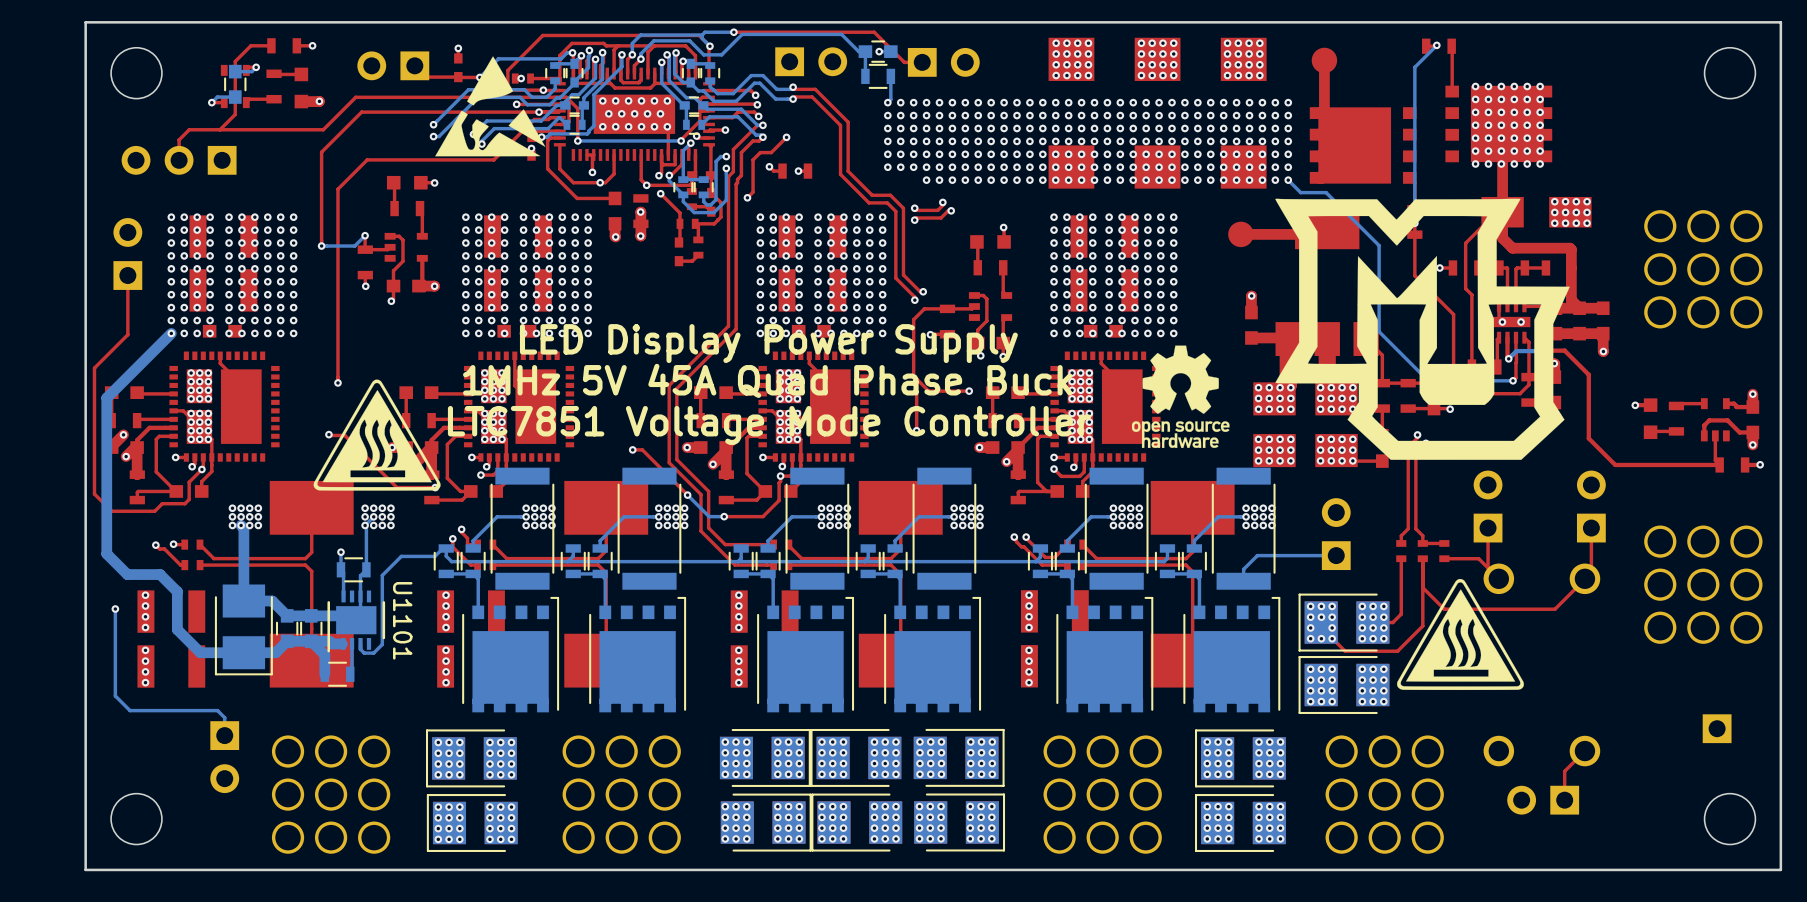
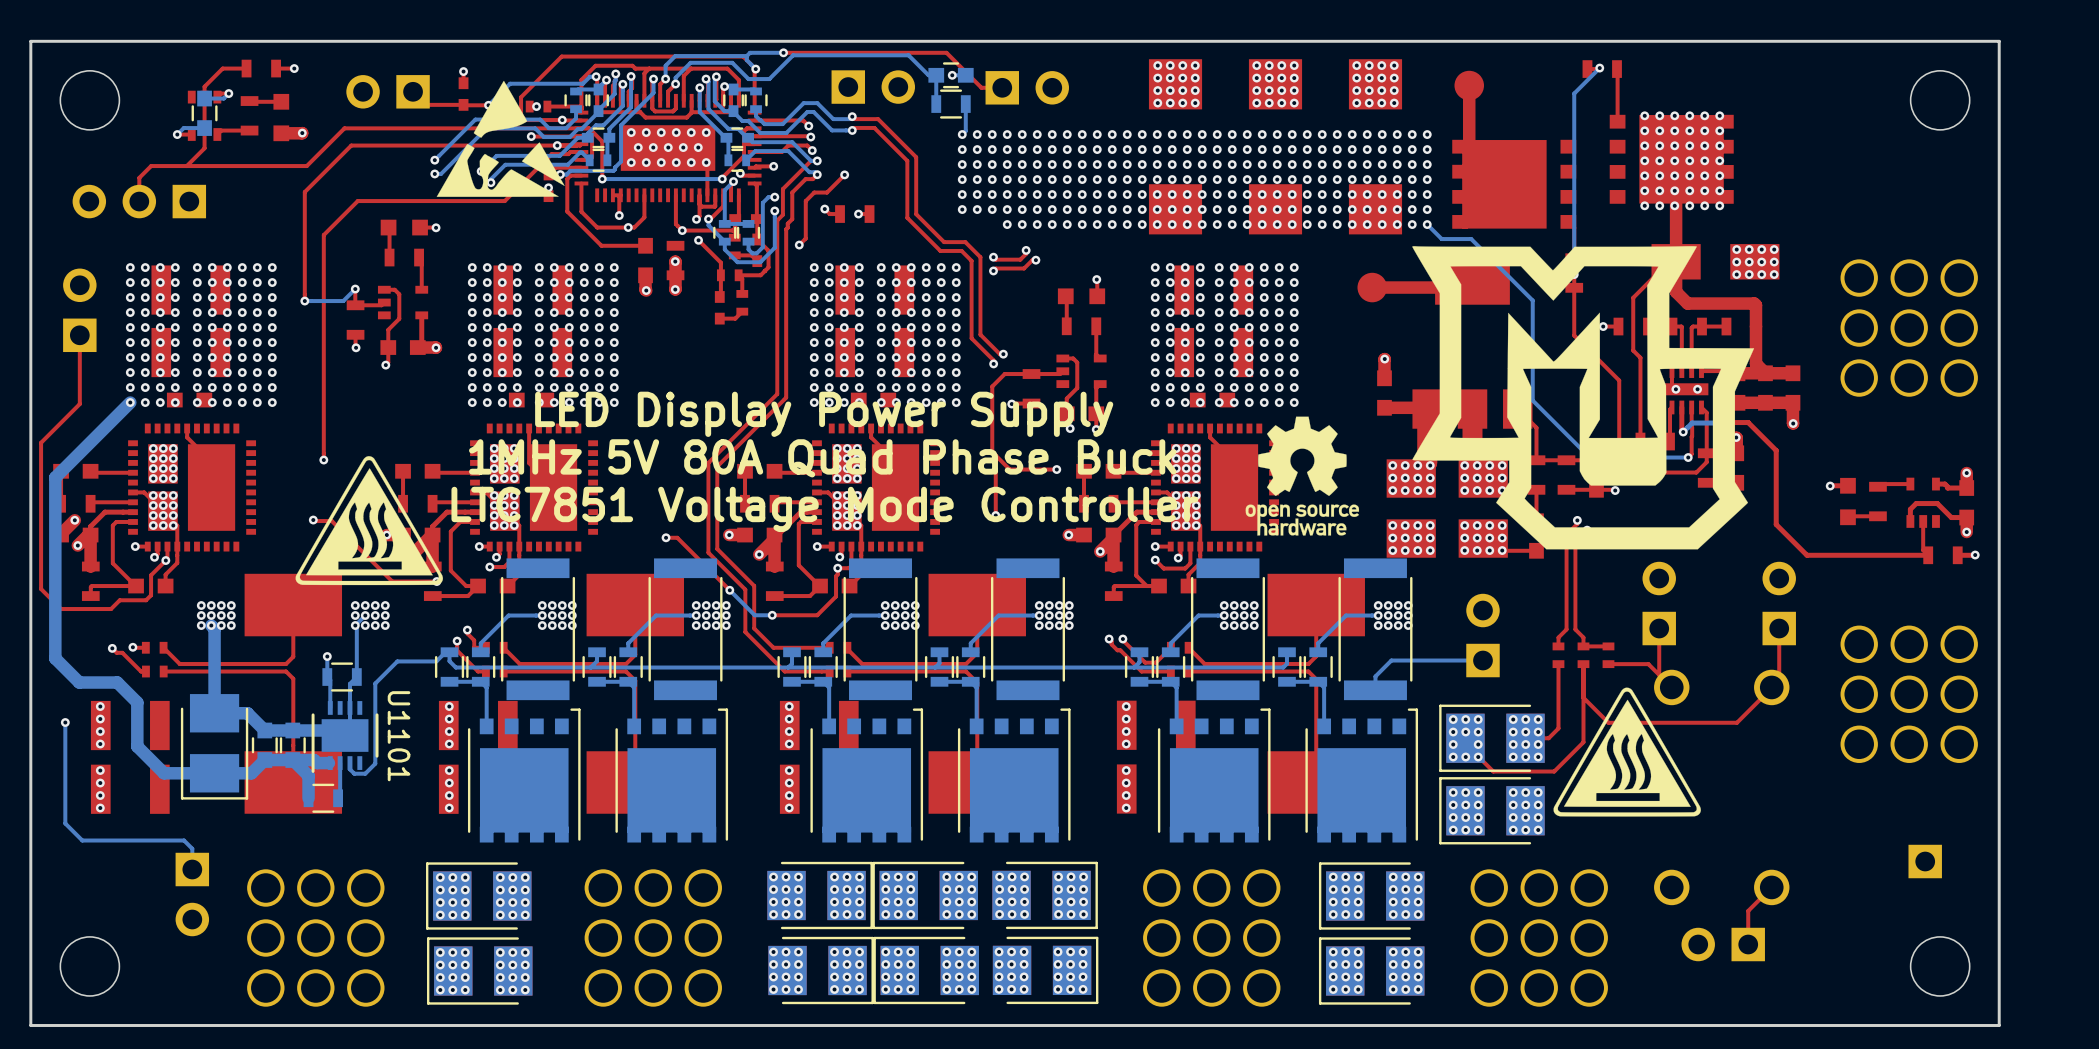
text: 1MHz 5V 45A Quad Phase Buck (767, 380) -> 1MHz 5V 80A Quad Phase Buck (822, 458)

